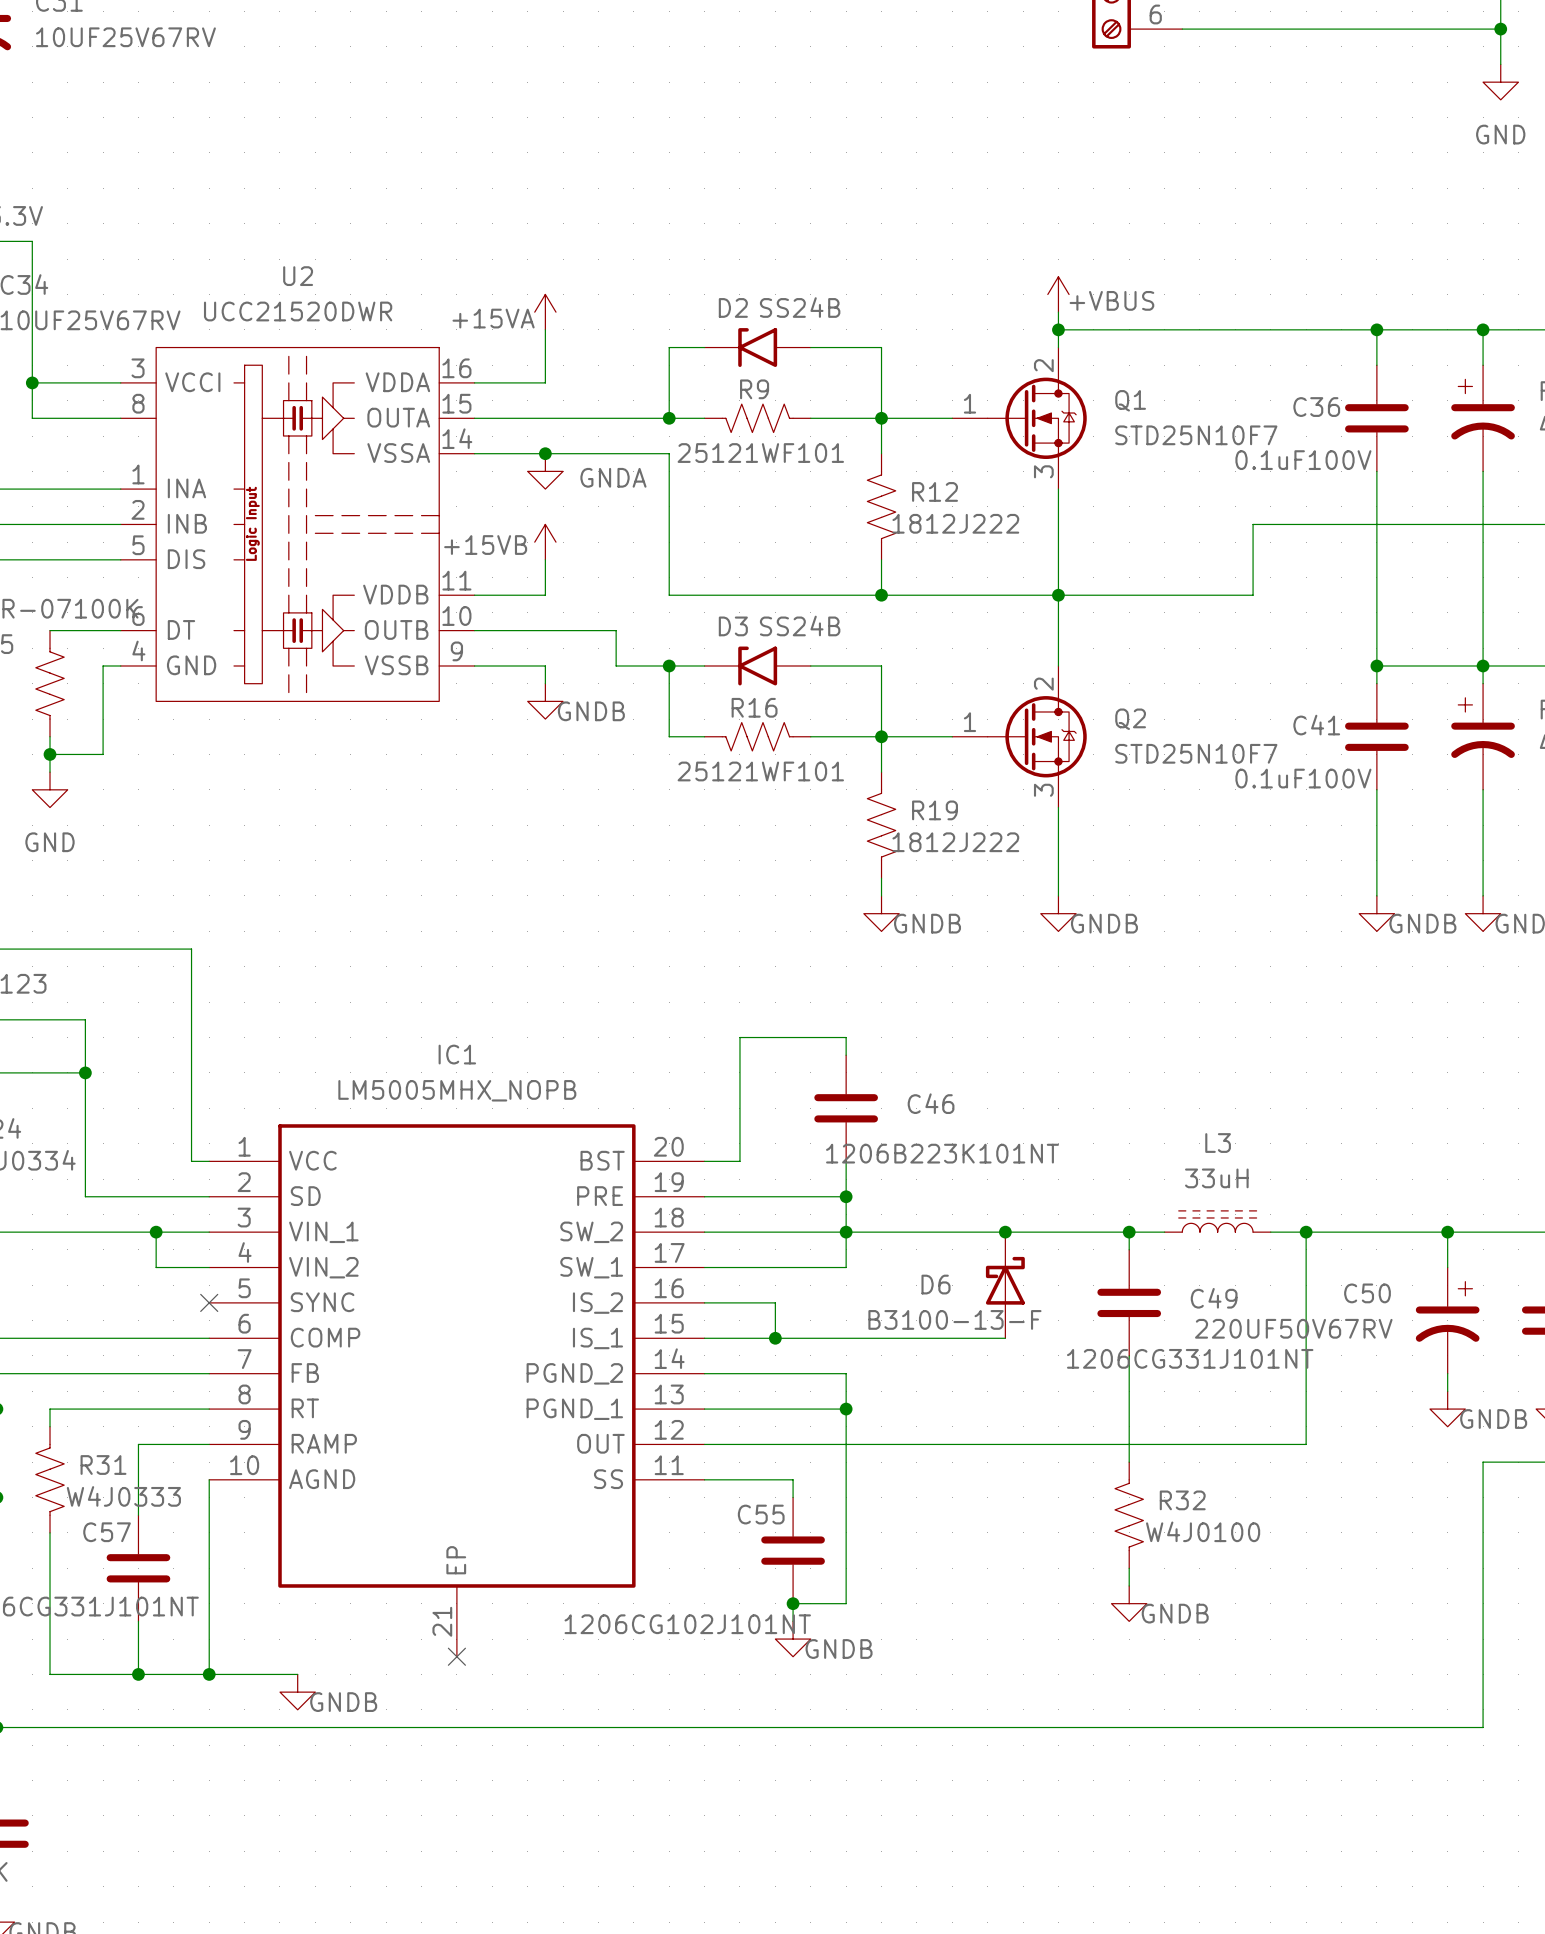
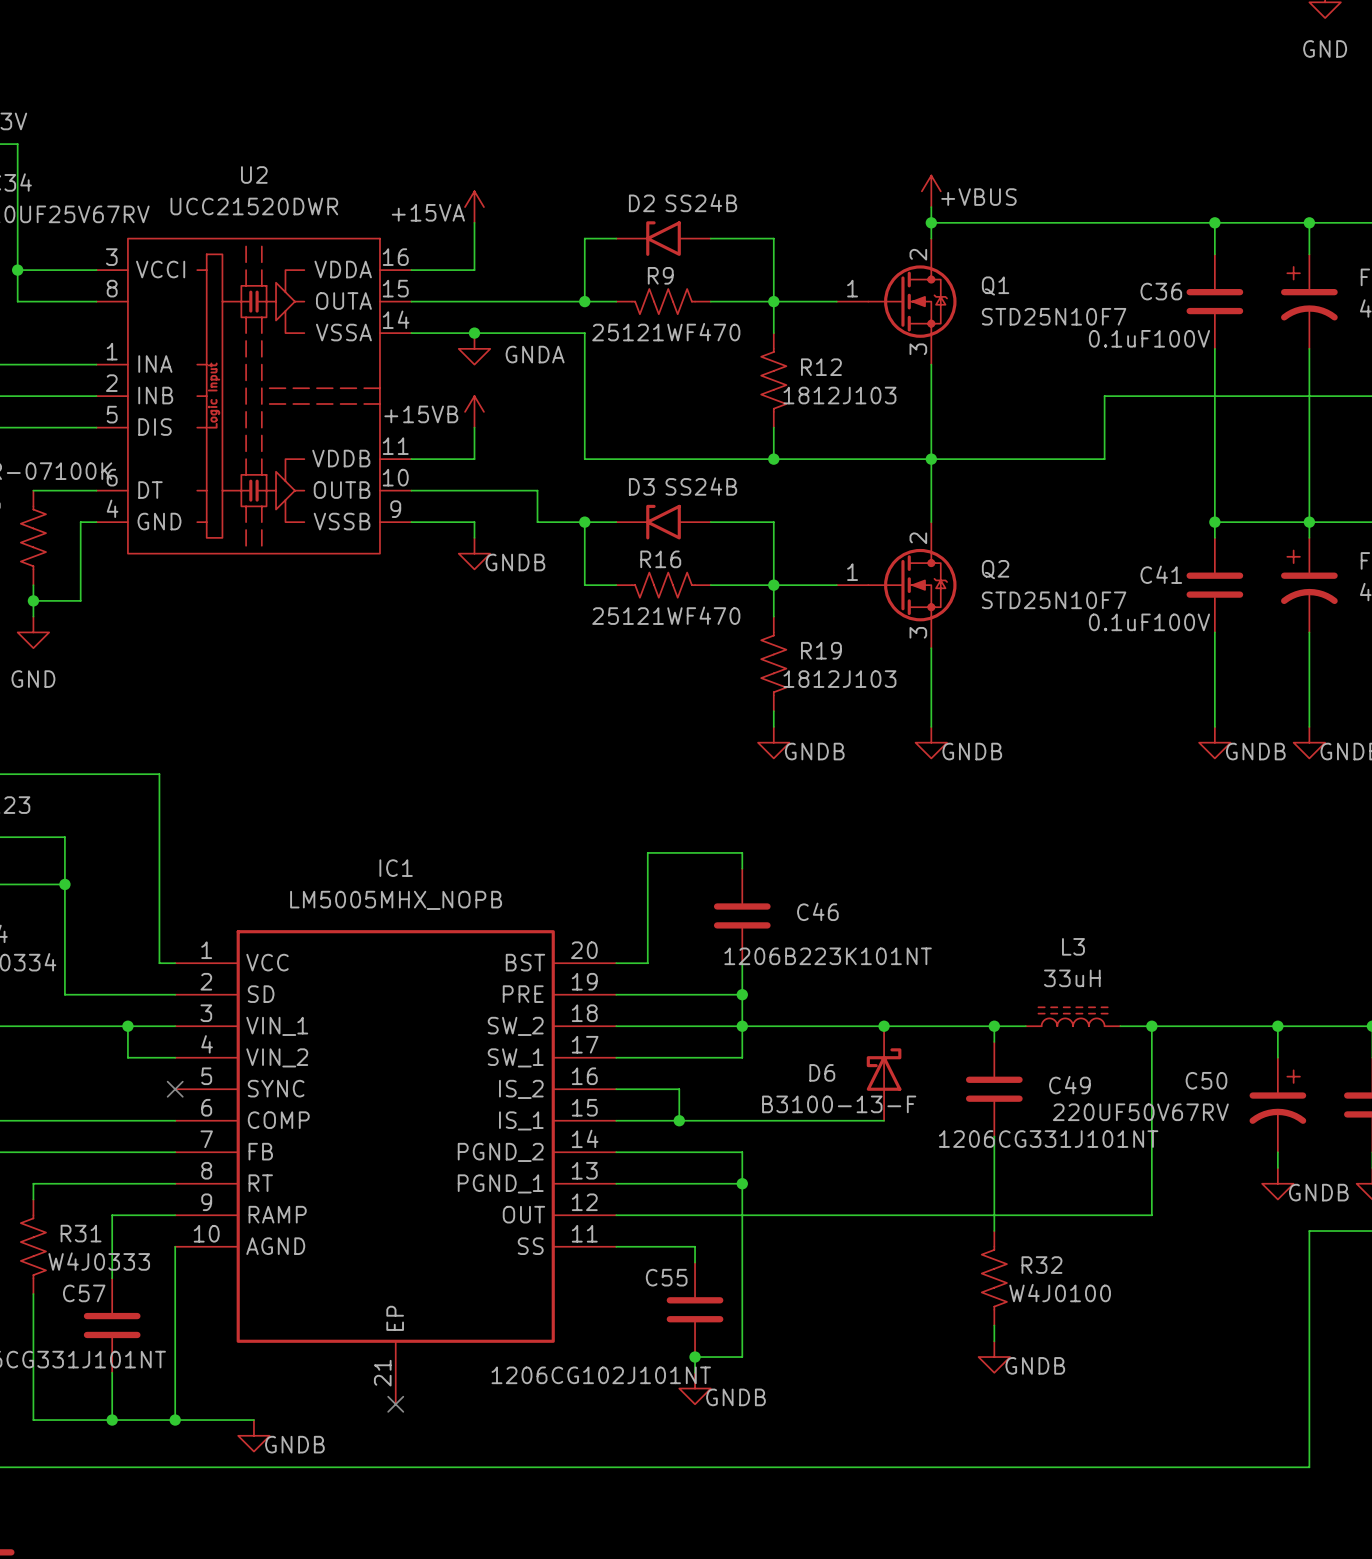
R9 value: 25121WF101 (760, 453) -> 25121WF470 (666, 332)
R12 value: 1812J222 (955, 523) -> 1812J103 (839, 395)
R16 value: 25121WF101 (760, 771) -> 25121WF470 (666, 615)
R19 value: 1812J222 (955, 842) -> 1812J103 (839, 679)

